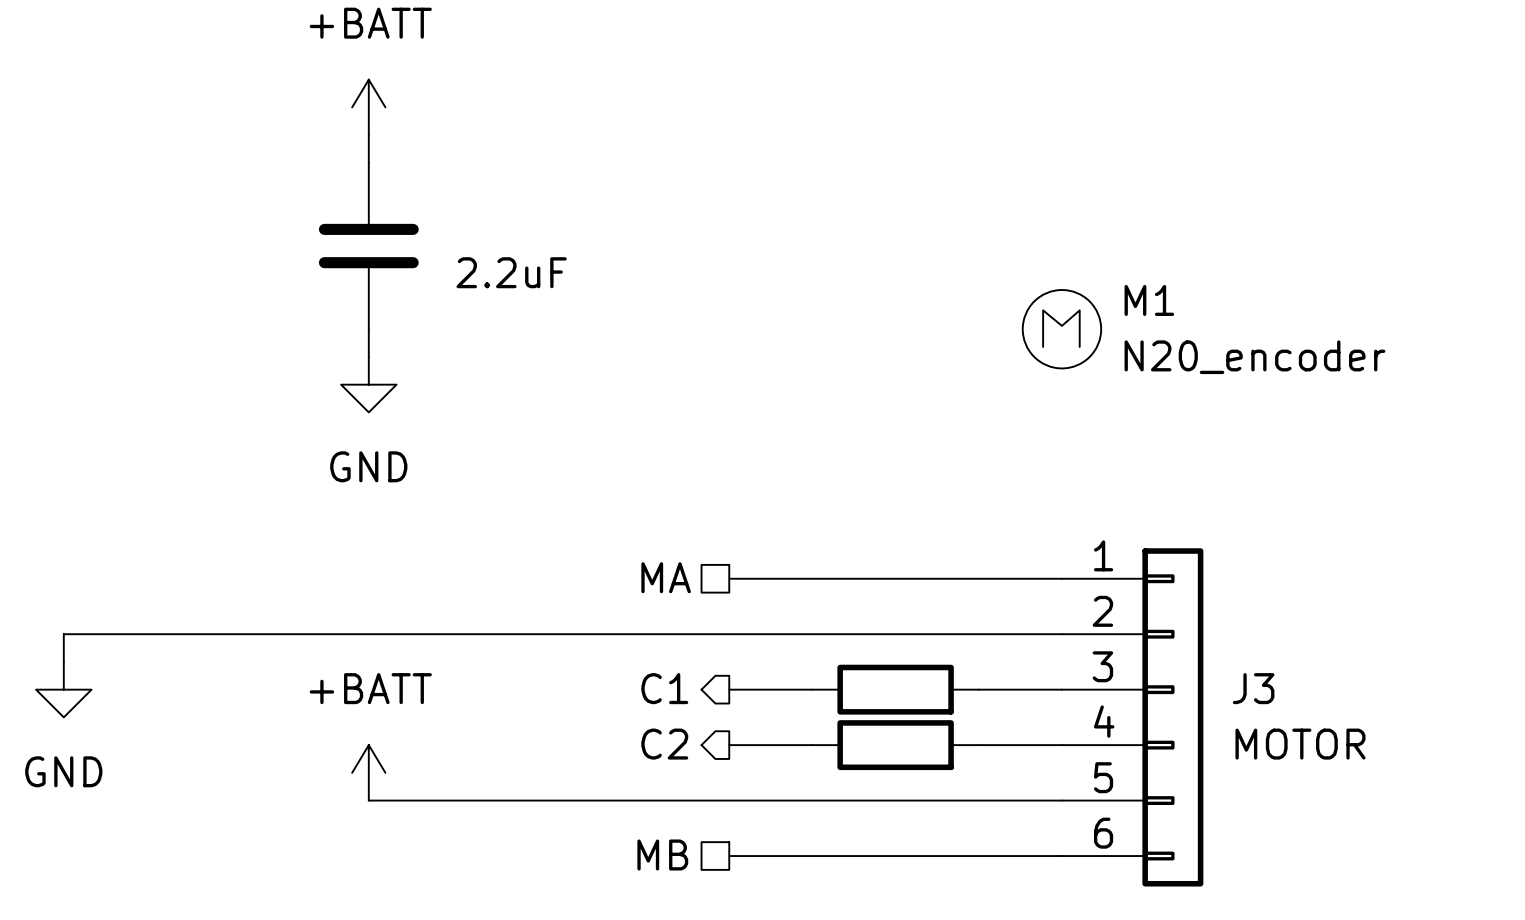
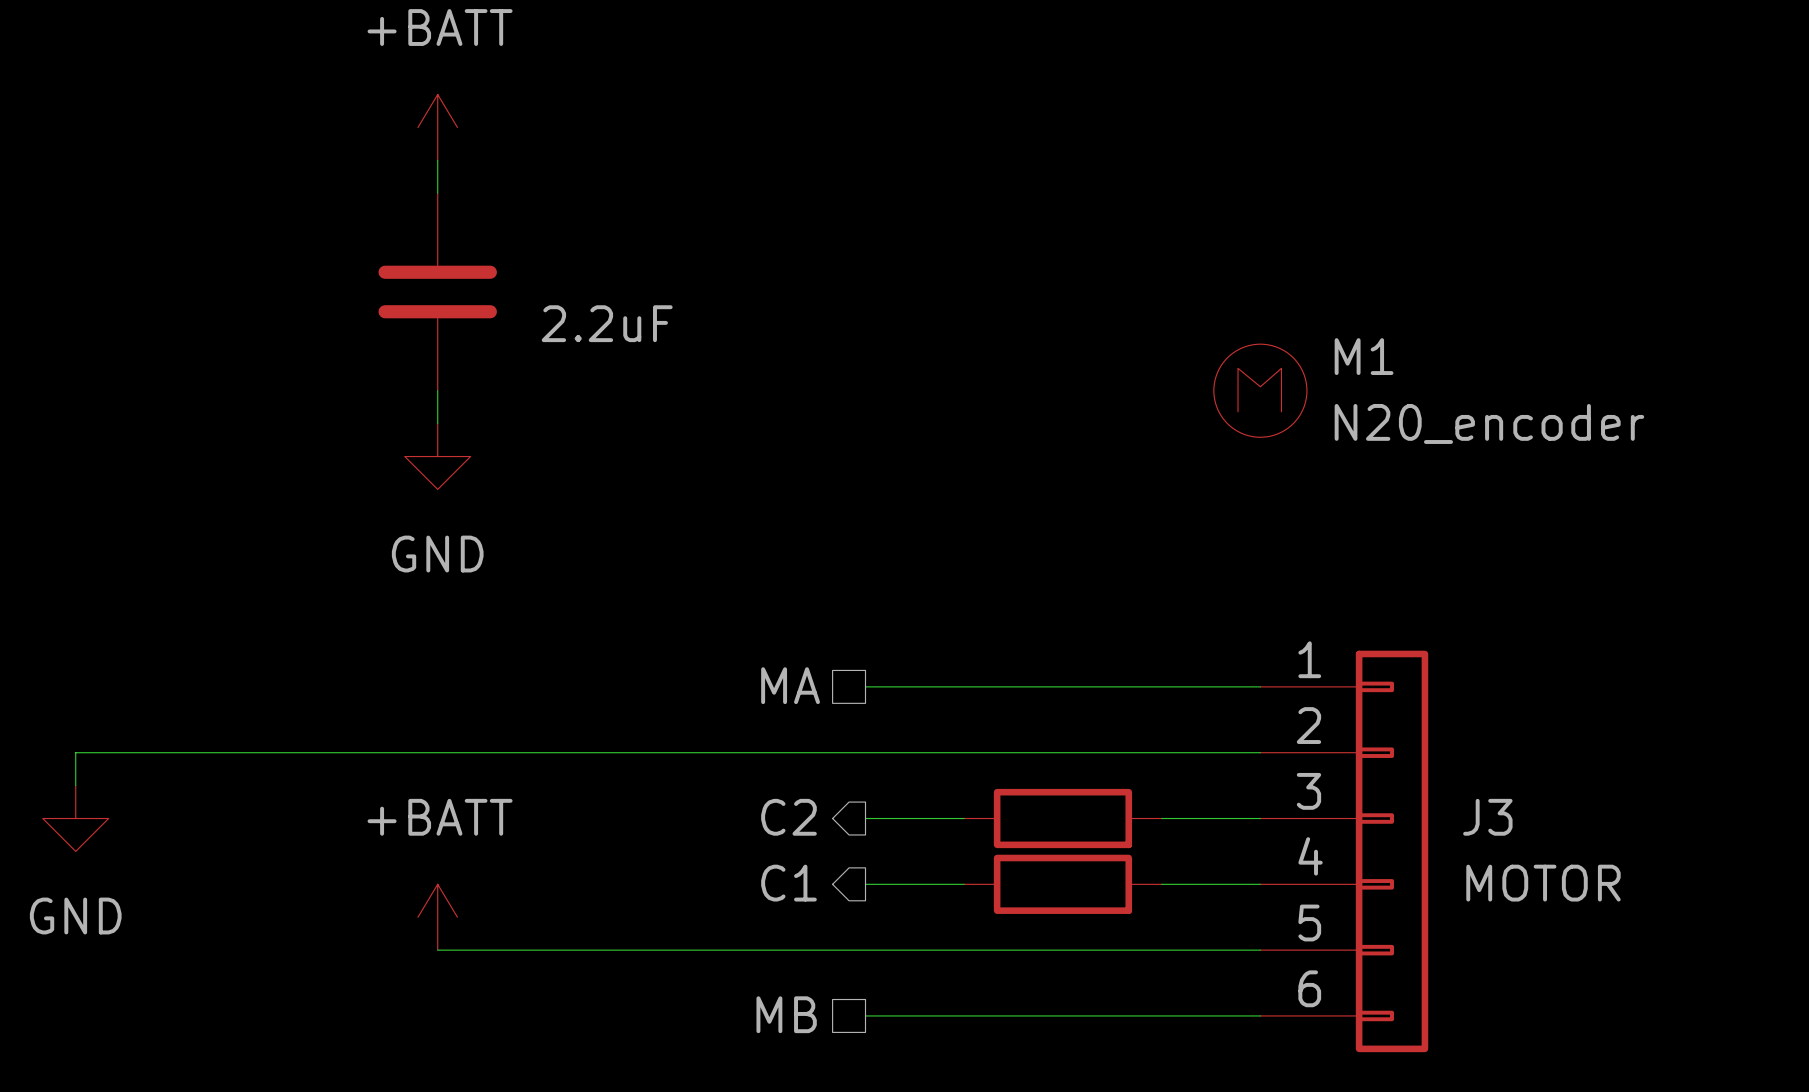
hierarchical label: C1 (664, 688) -> C2 (788, 817)
hierarchical label: C2 (664, 744) -> C1 (788, 883)

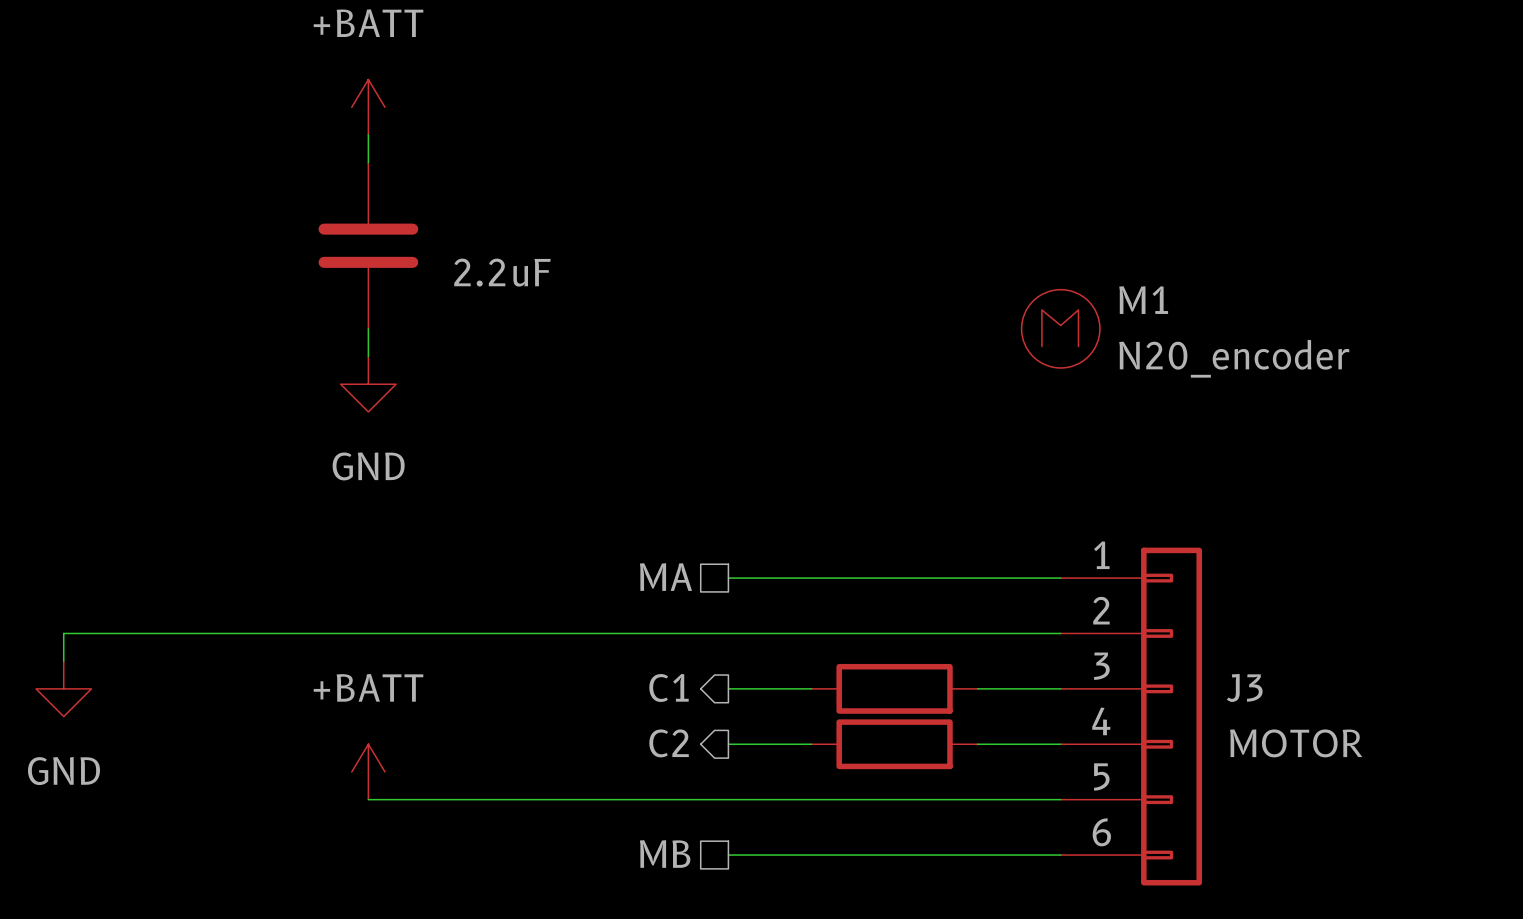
hierarchical label: C2 (788, 817) -> C1 (668, 687)
hierarchical label: C1 (788, 883) -> C2 (669, 743)

